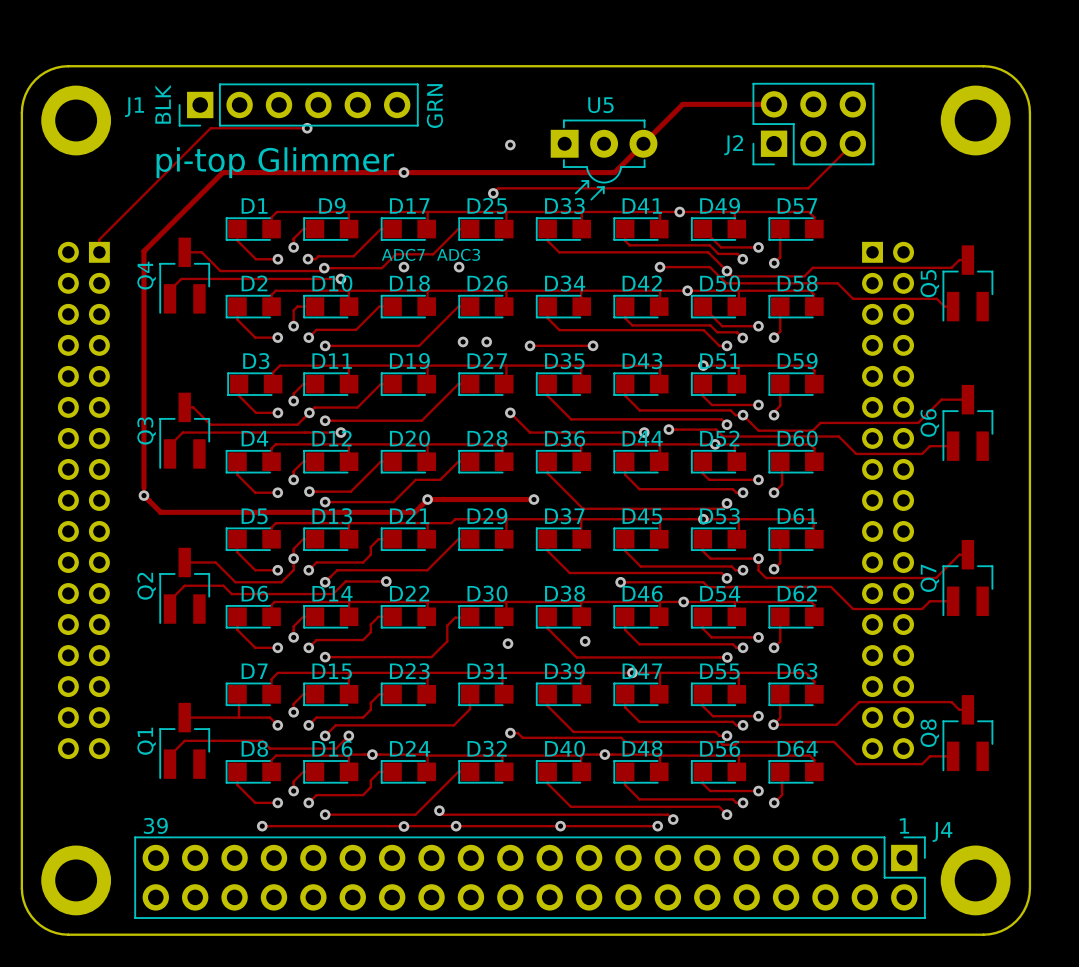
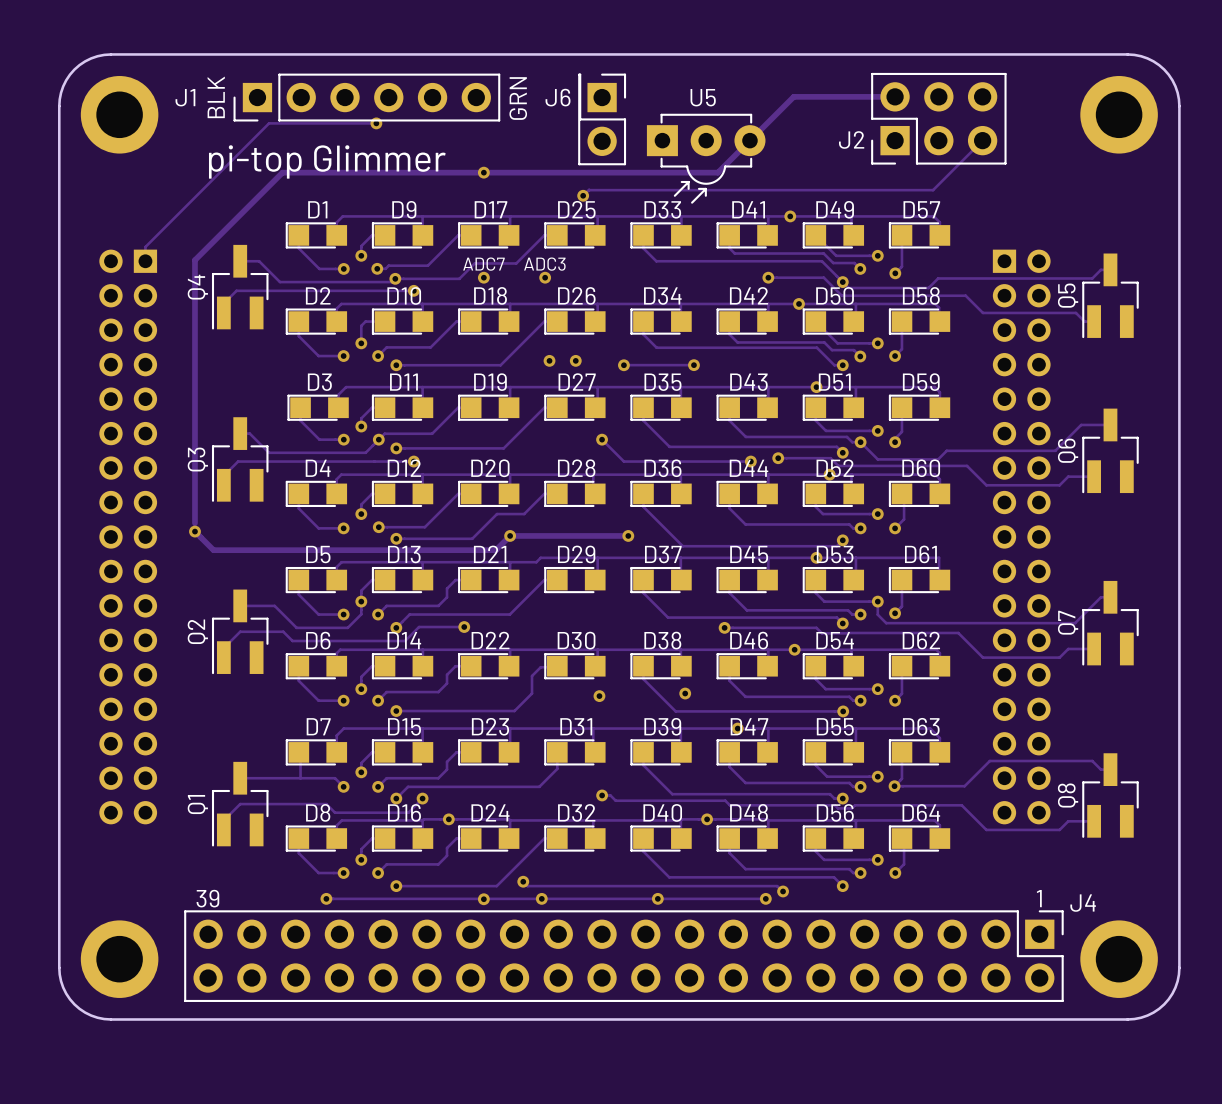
J6: none -> (602, 119)
via: (510, 145) -> none

